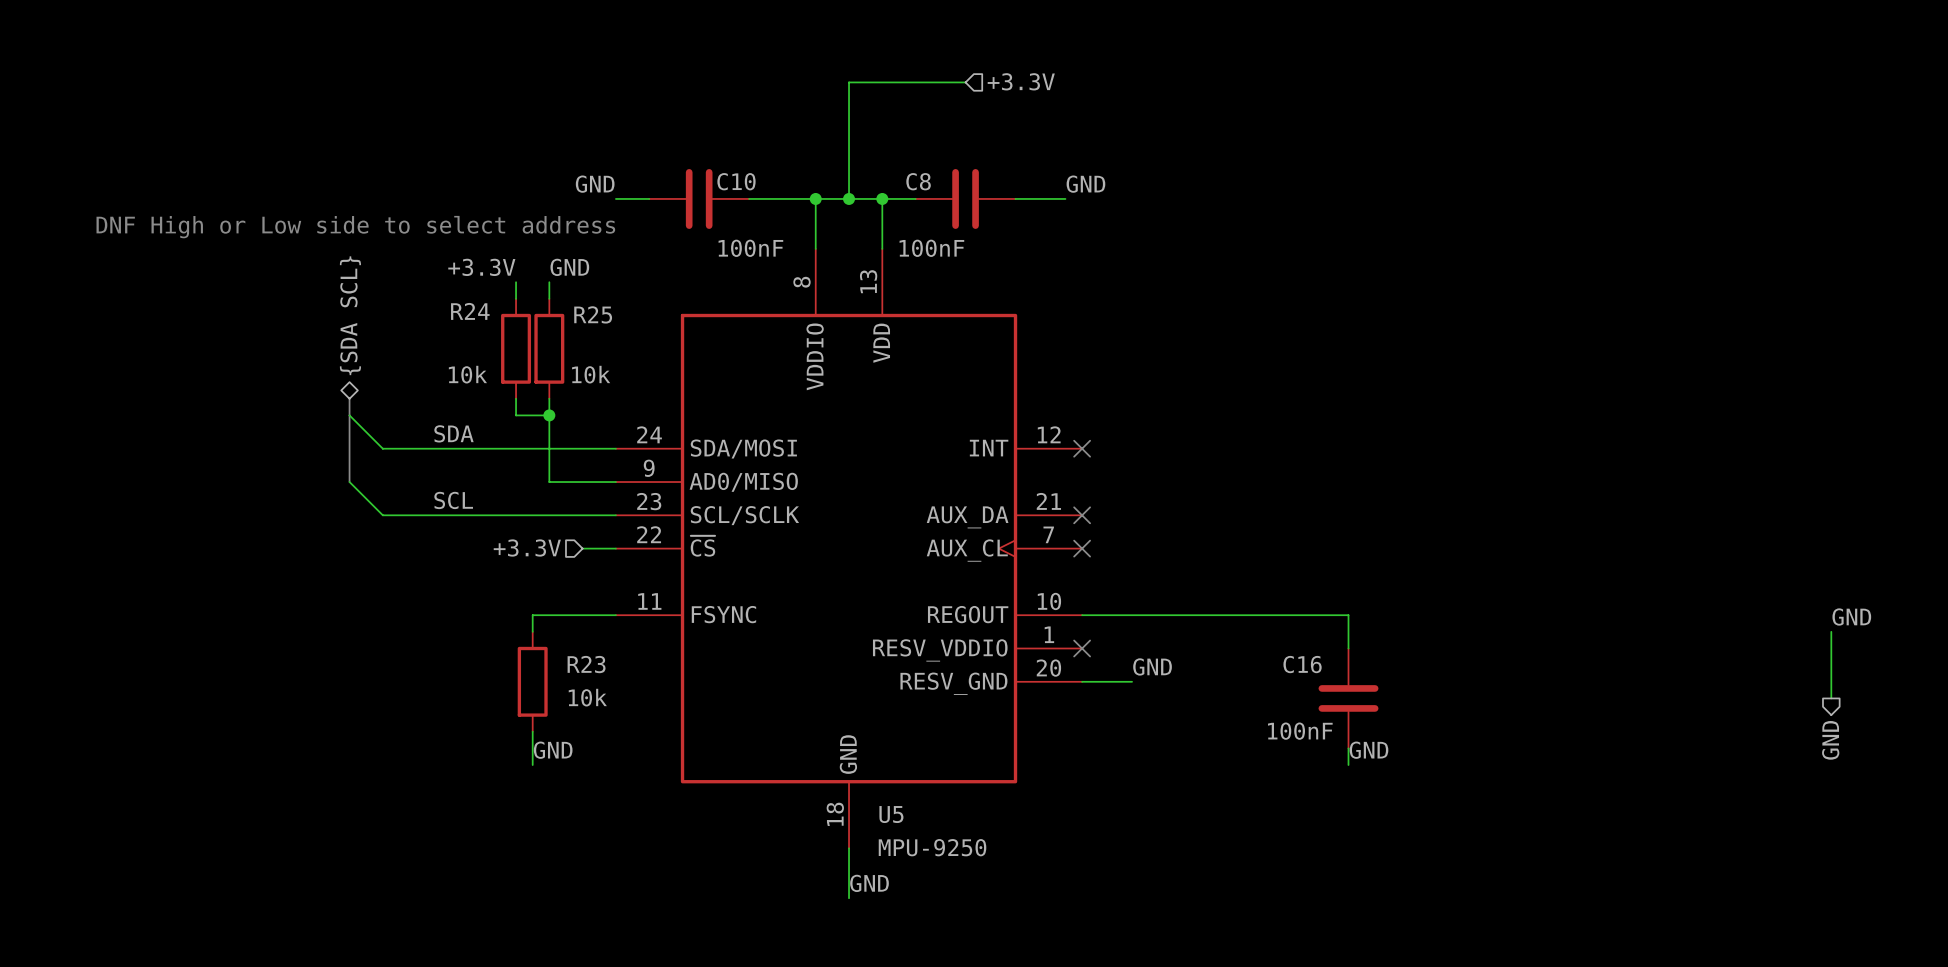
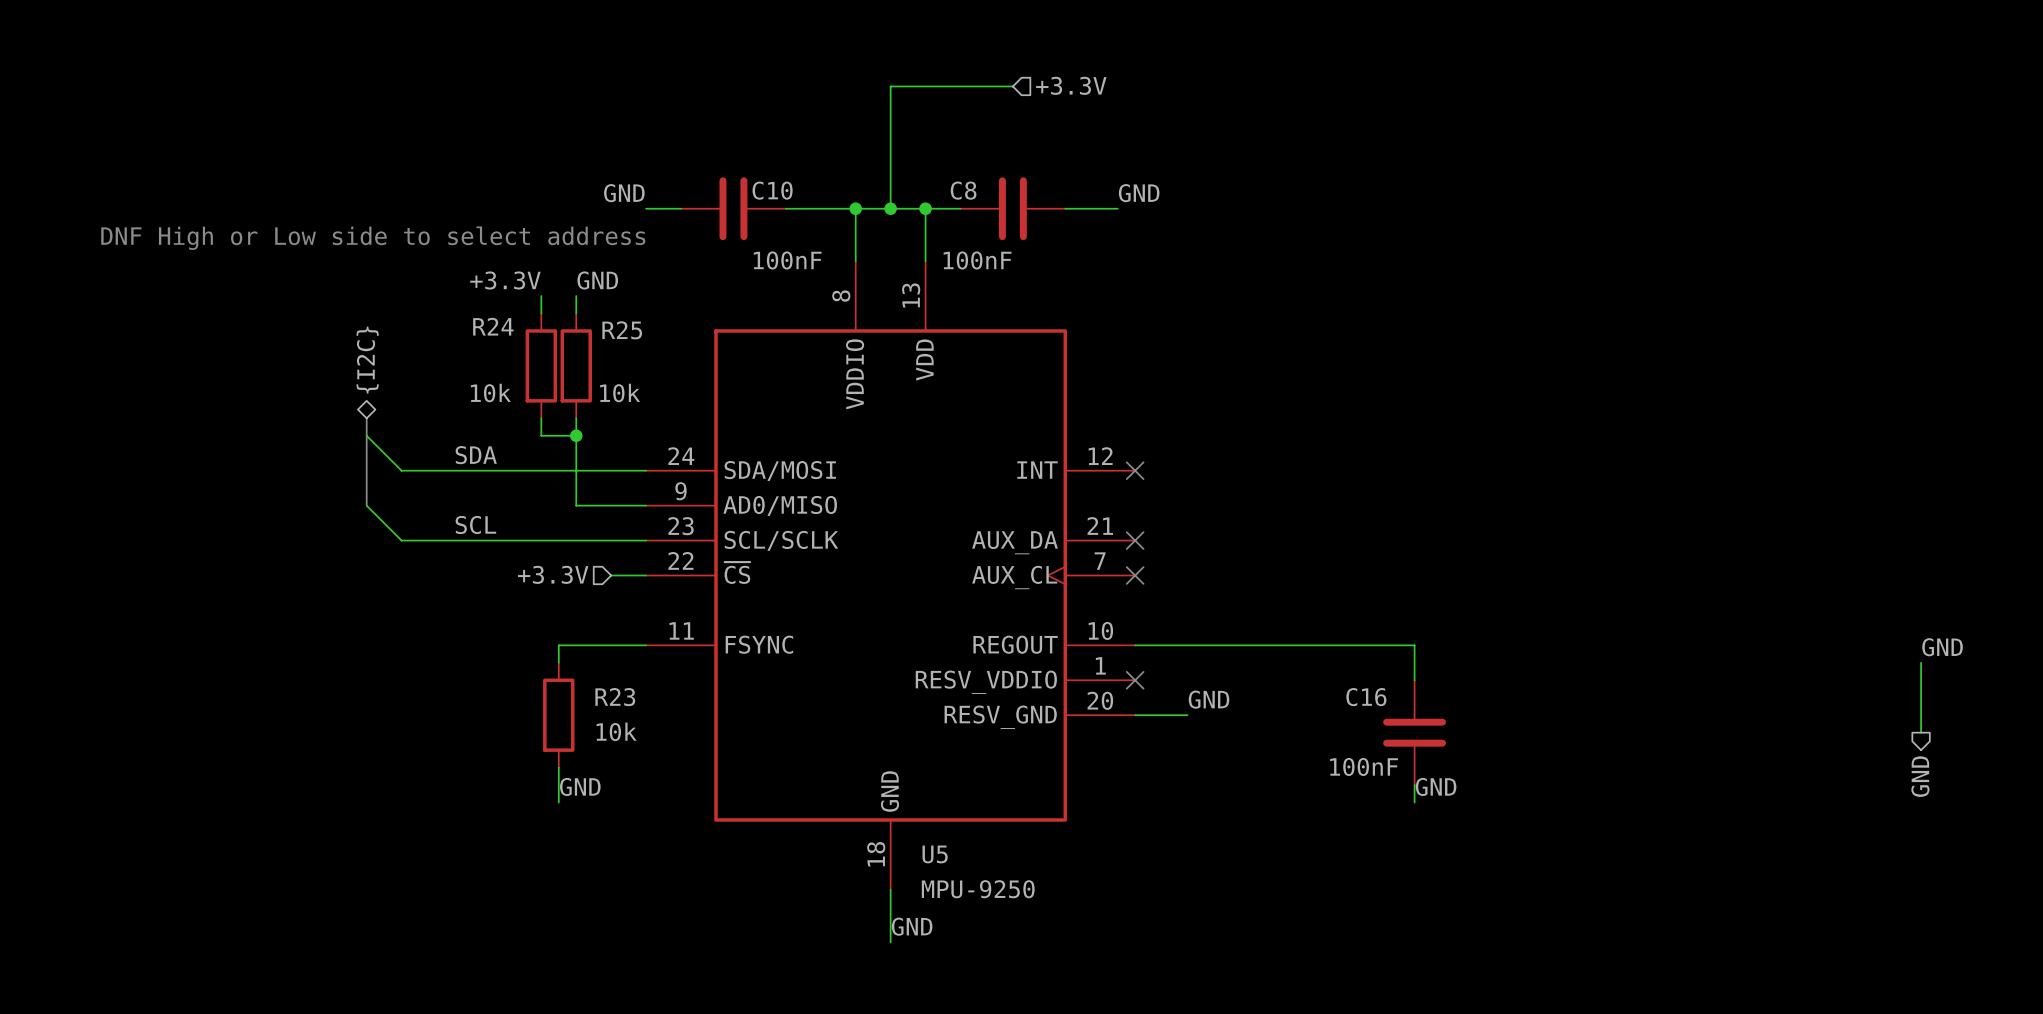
hierarchical label: {SDA SCL} (350, 315) -> {I2C} (367, 360)

